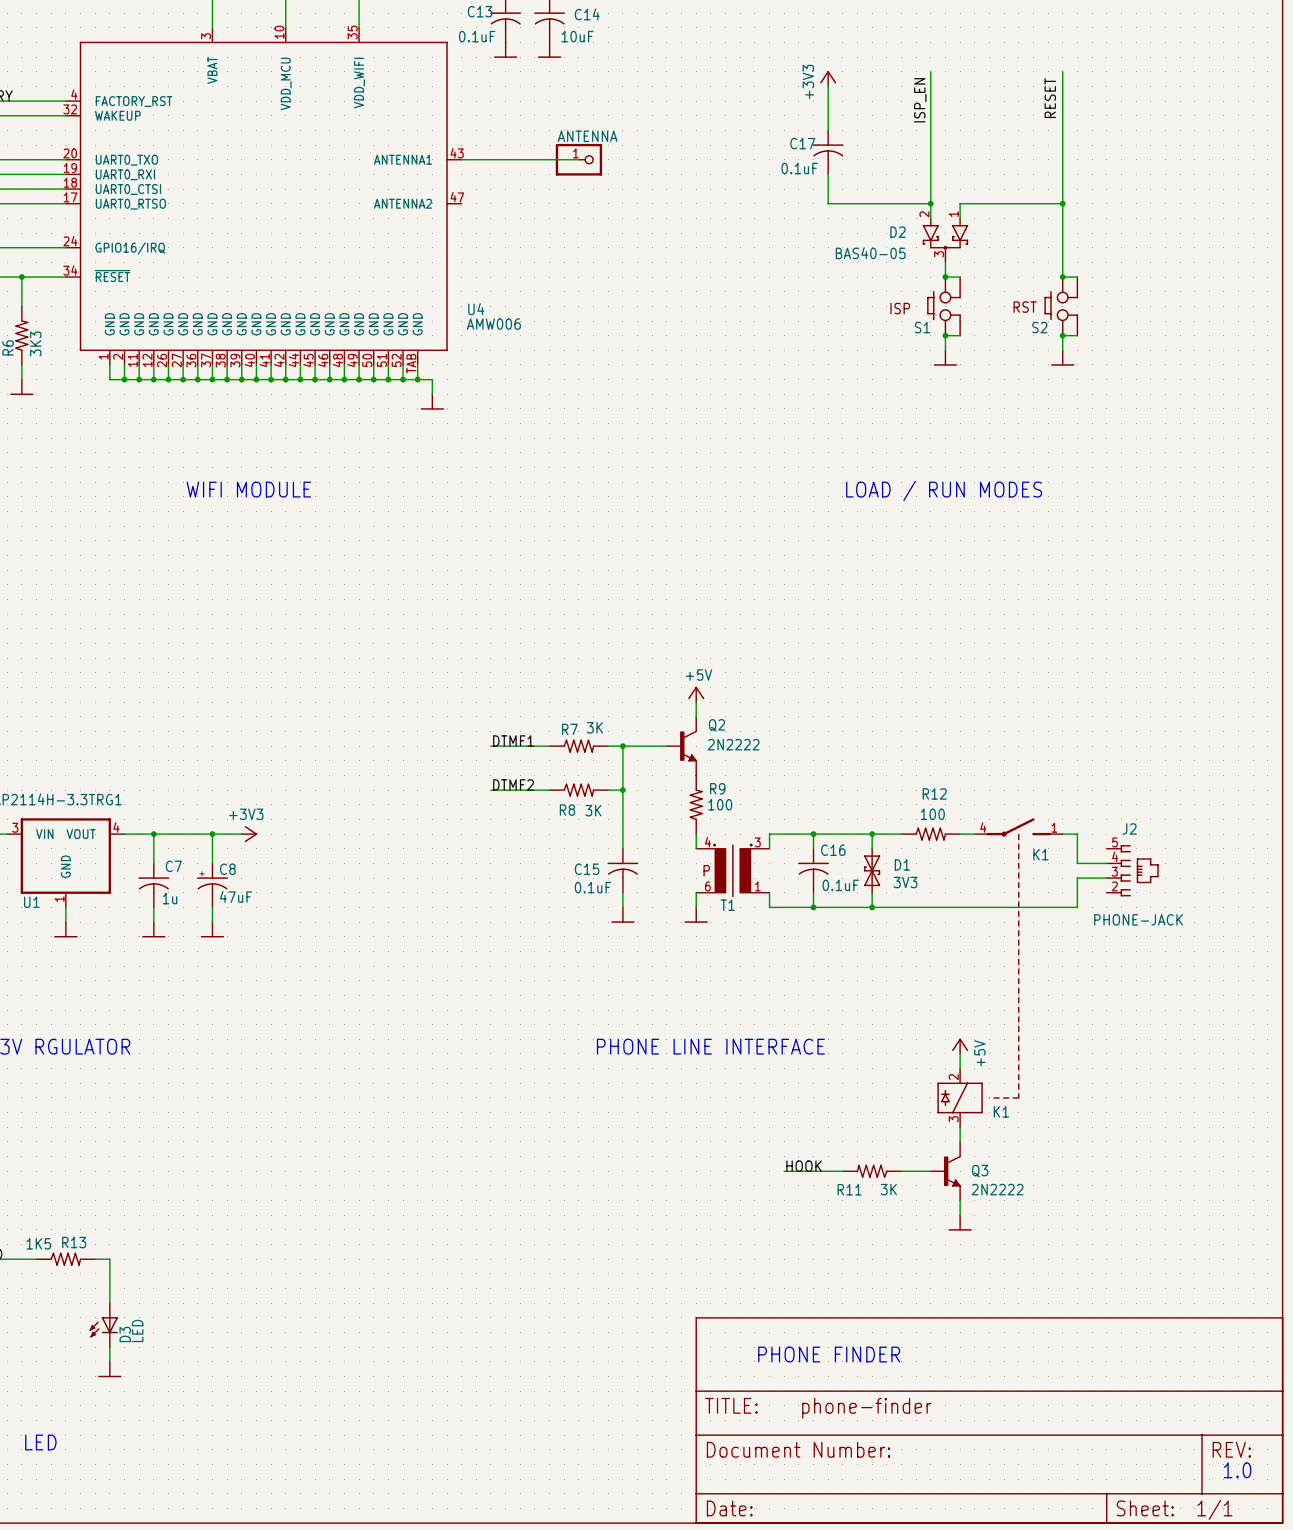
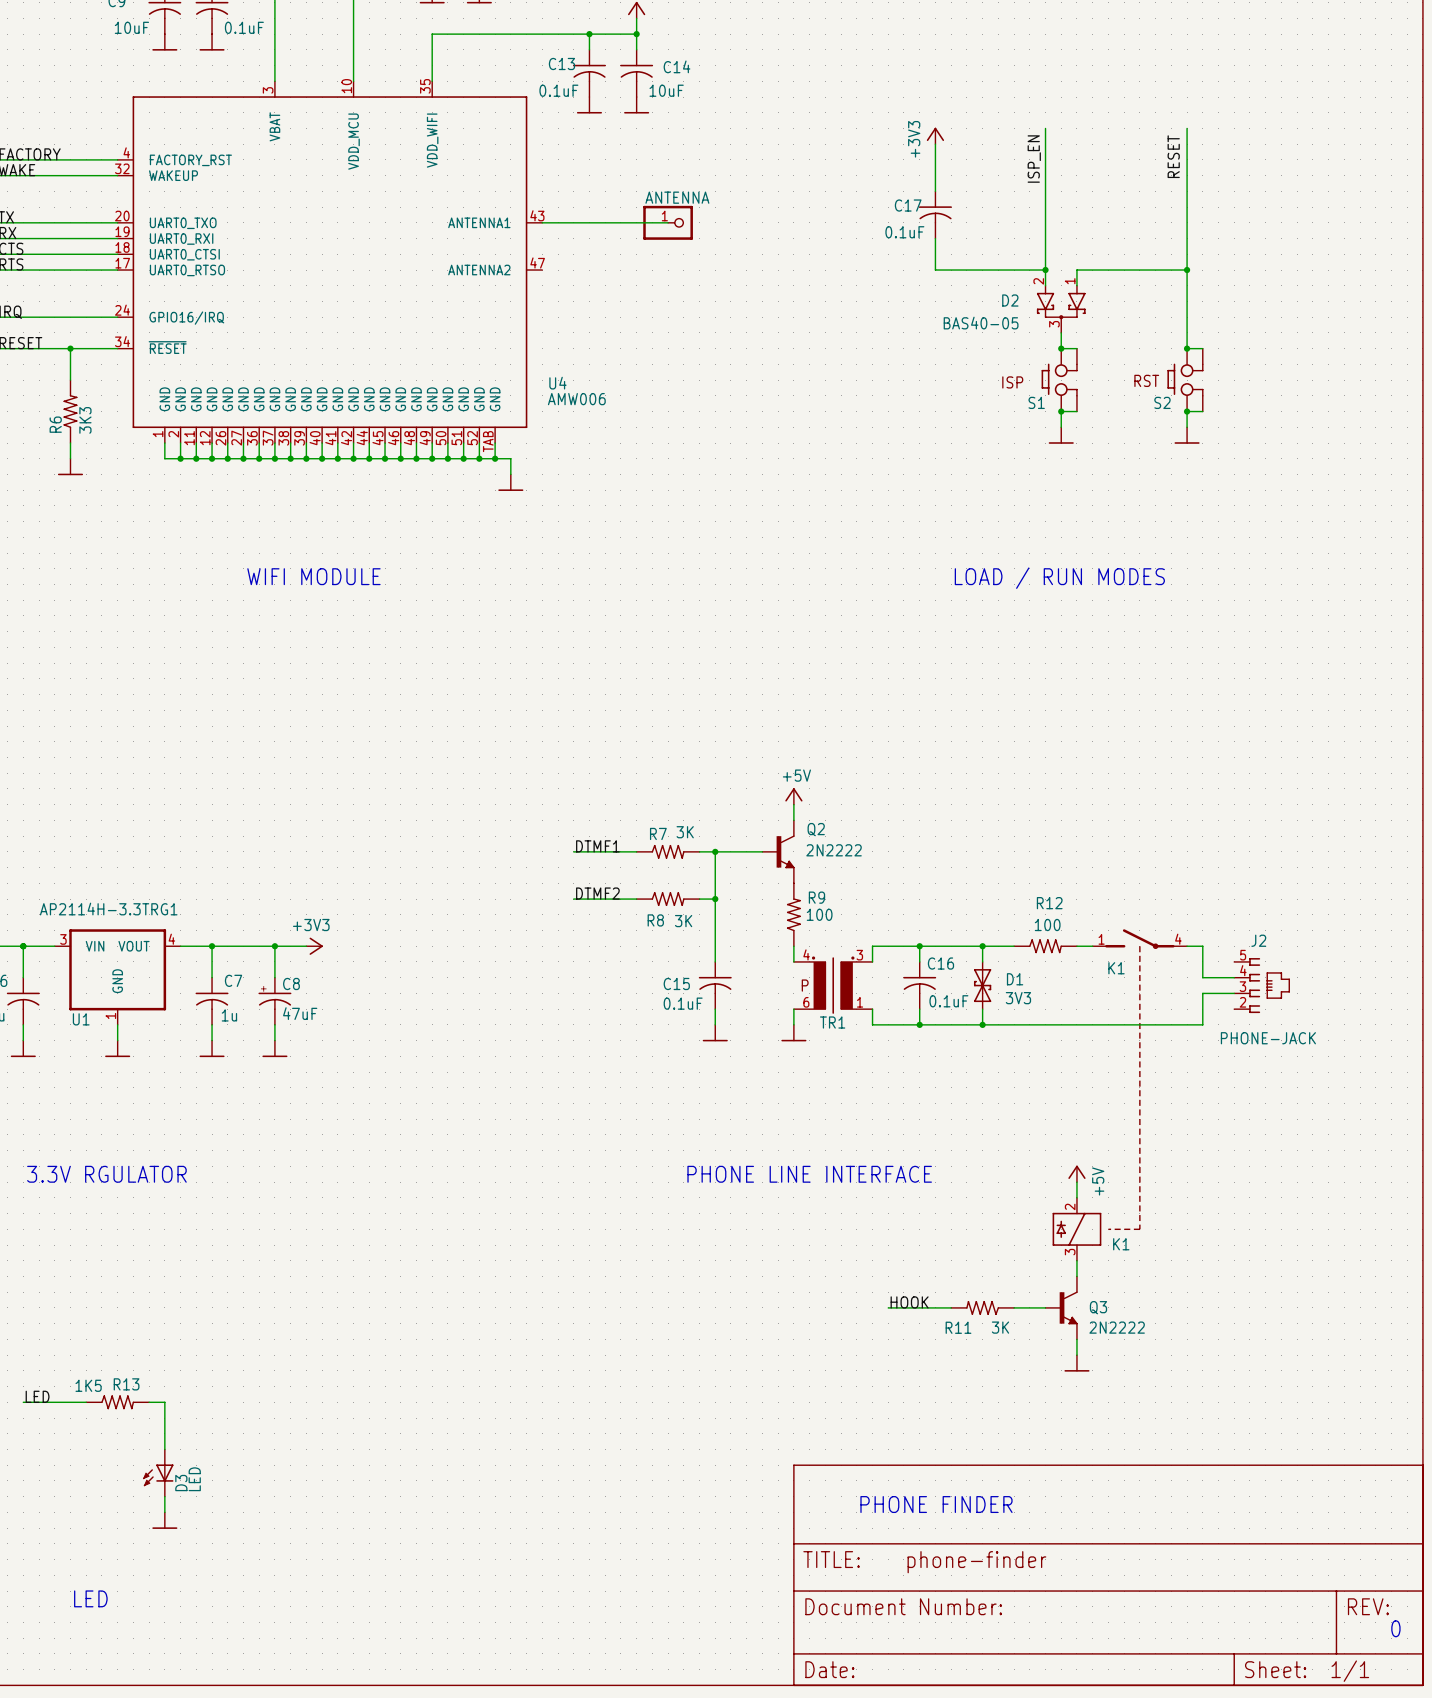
K1 flip: as is (1018, 827) -> left-right (1139, 939)
T1 name: T1 (727, 905) -> TR1 (832, 1022)
text: 1.0 (1237, 1470) -> none
text: none -> 0 (1395, 1628)

